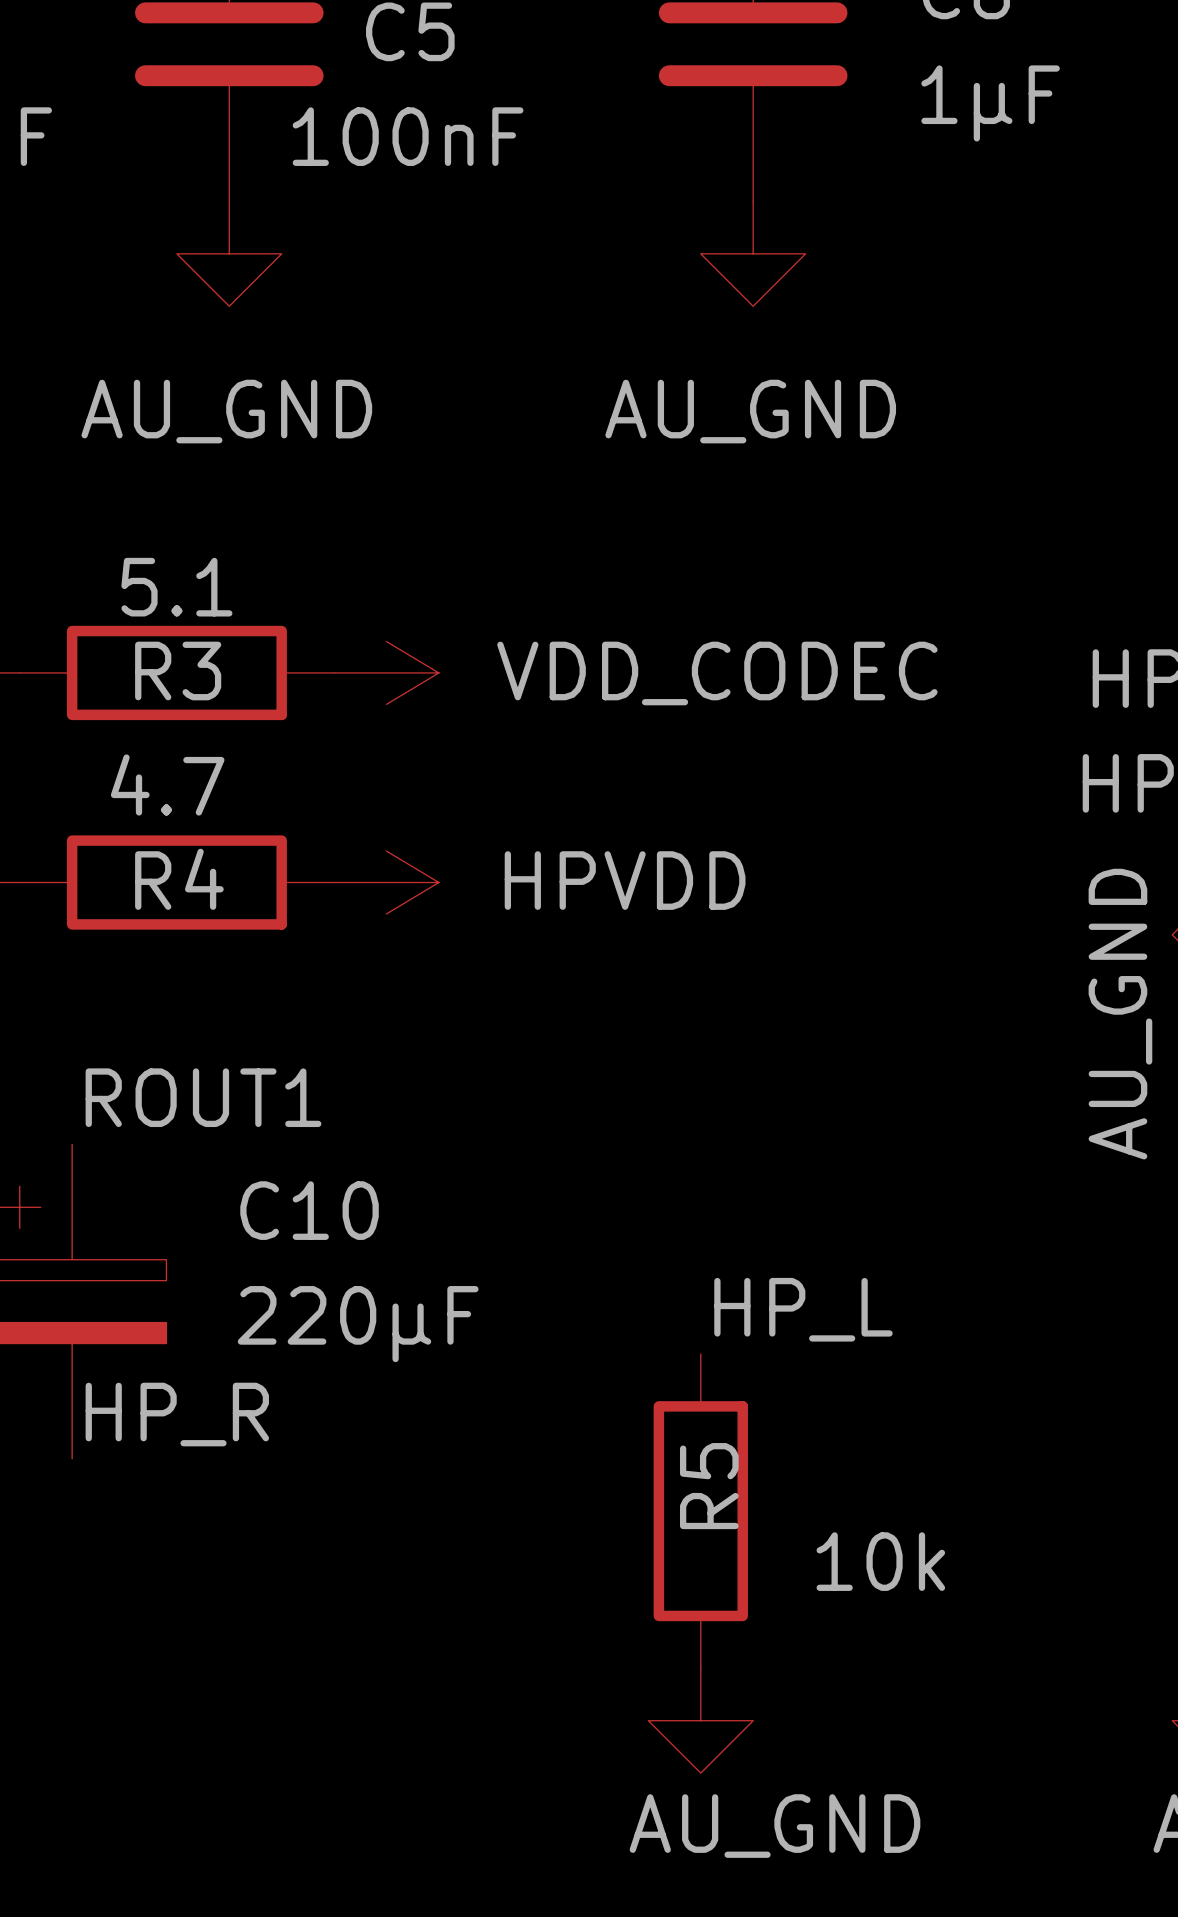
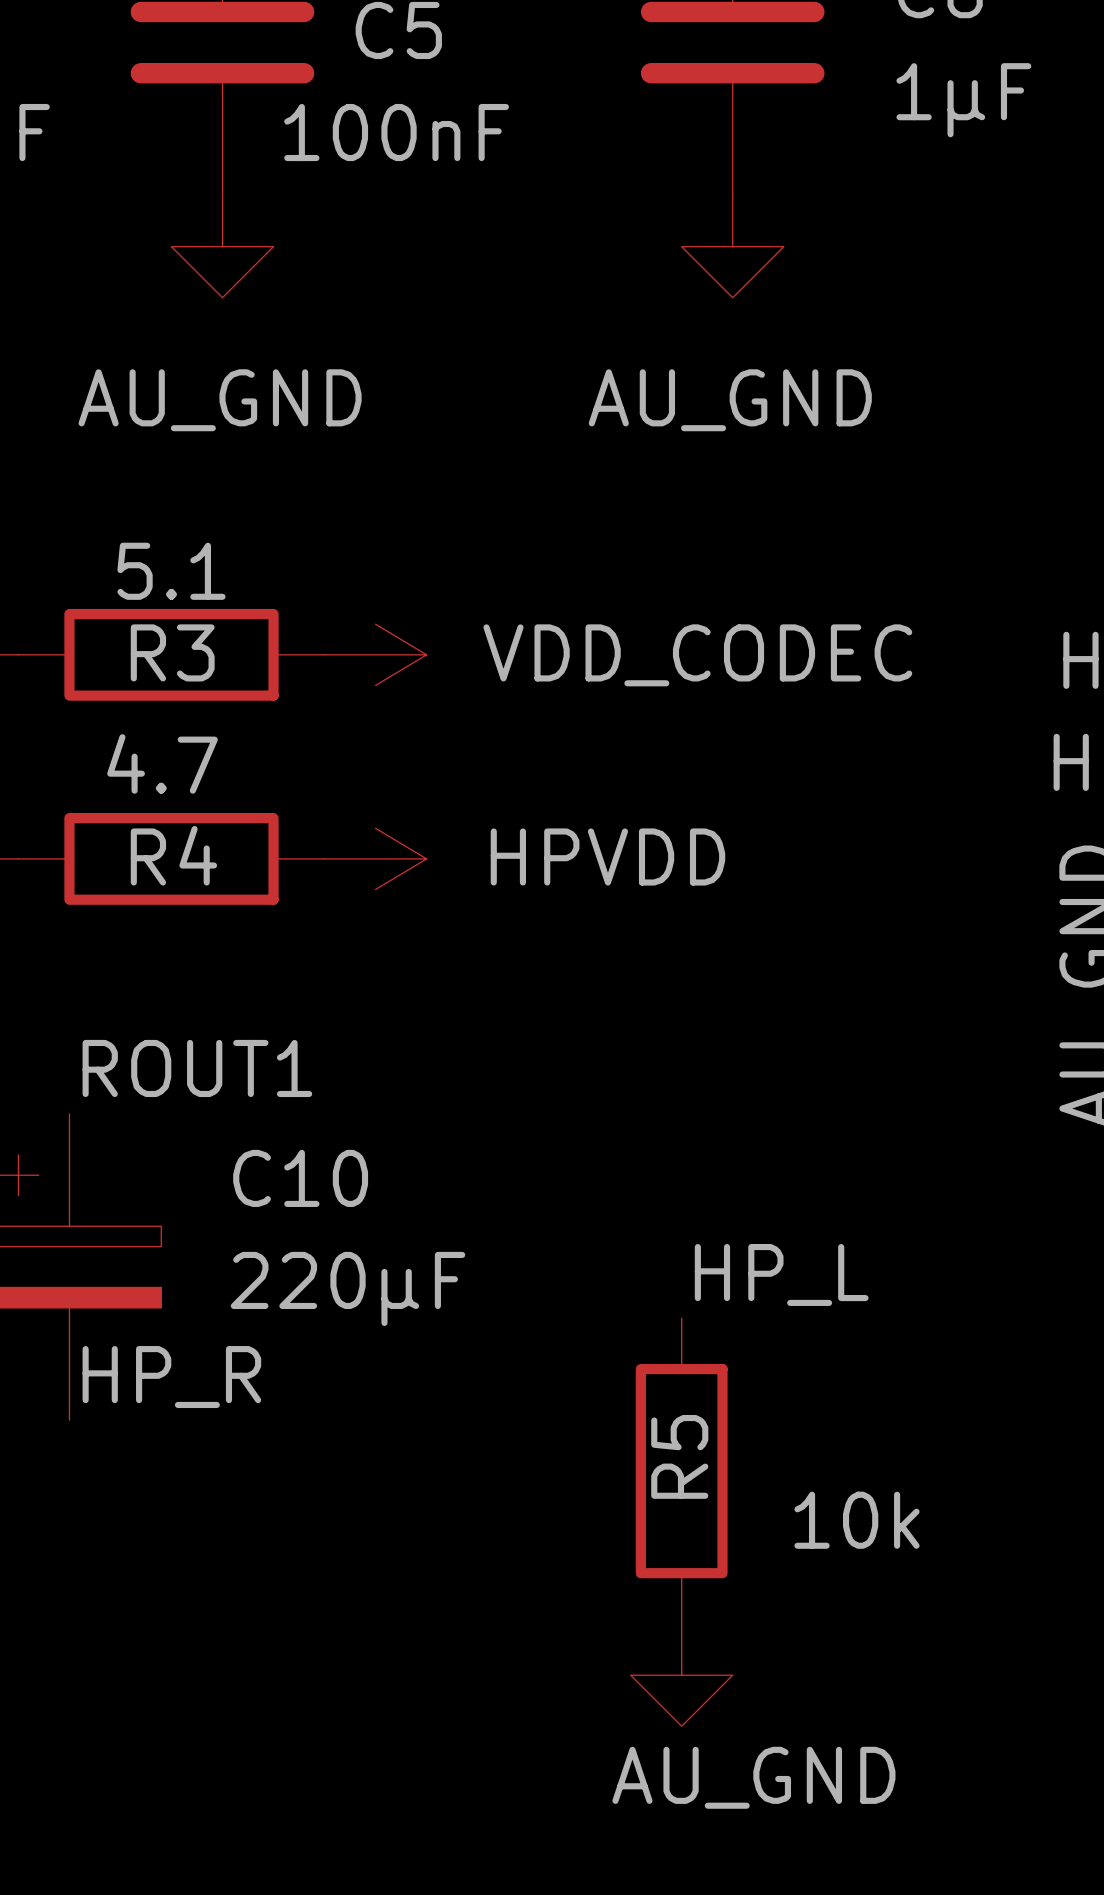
R5 name position: R5 (709, 1486) -> R5 (679, 1456)

